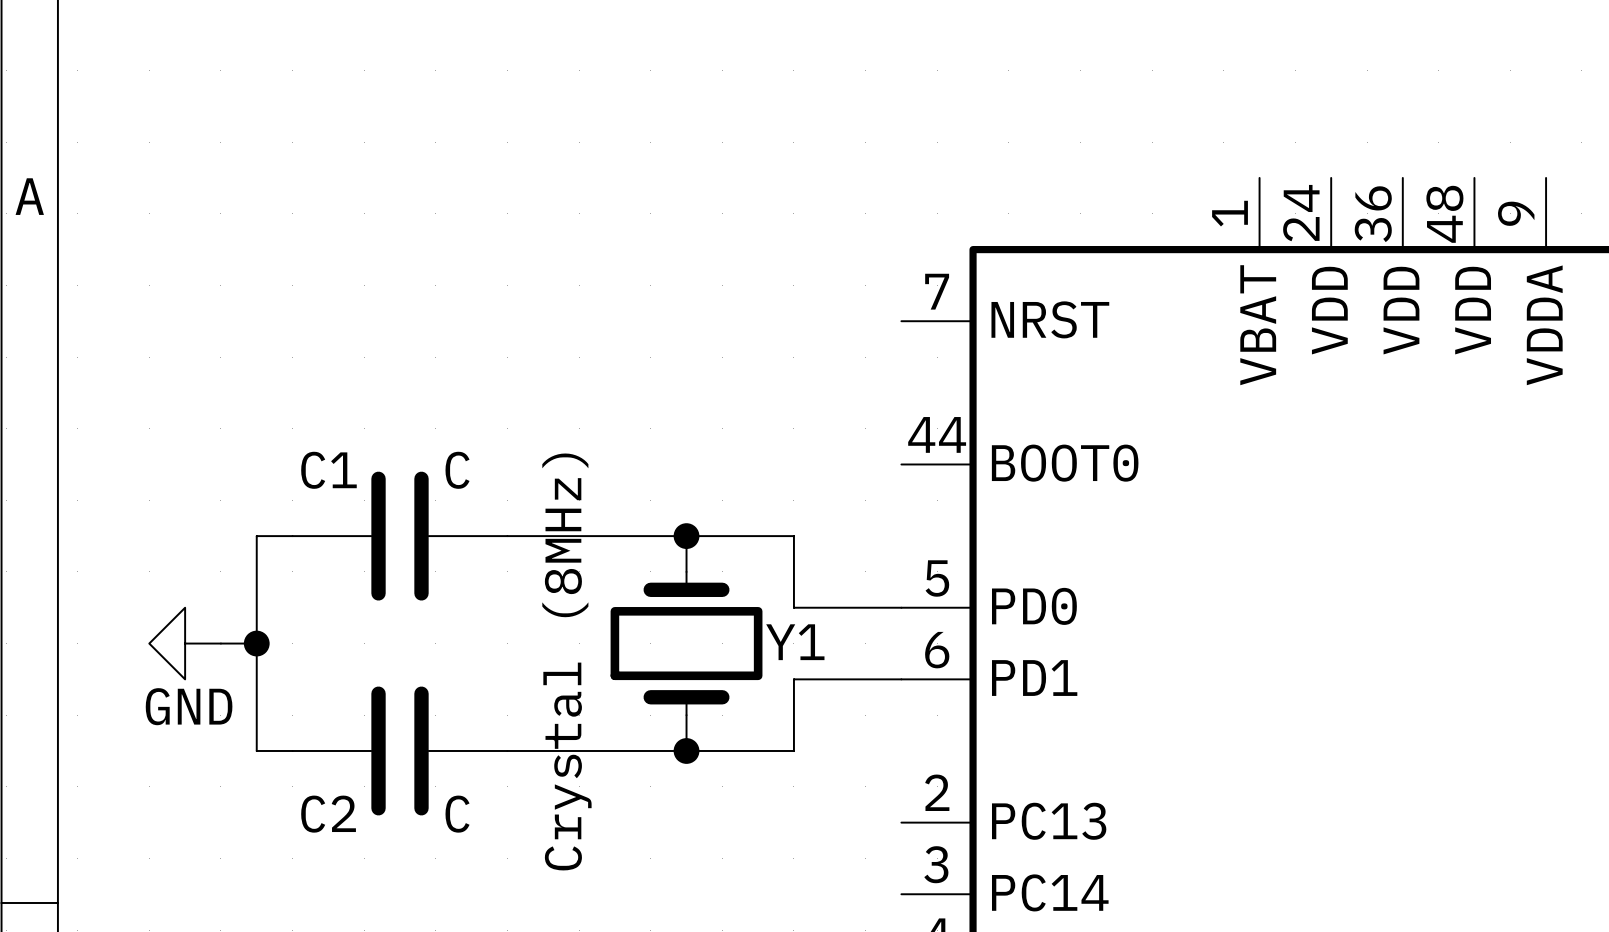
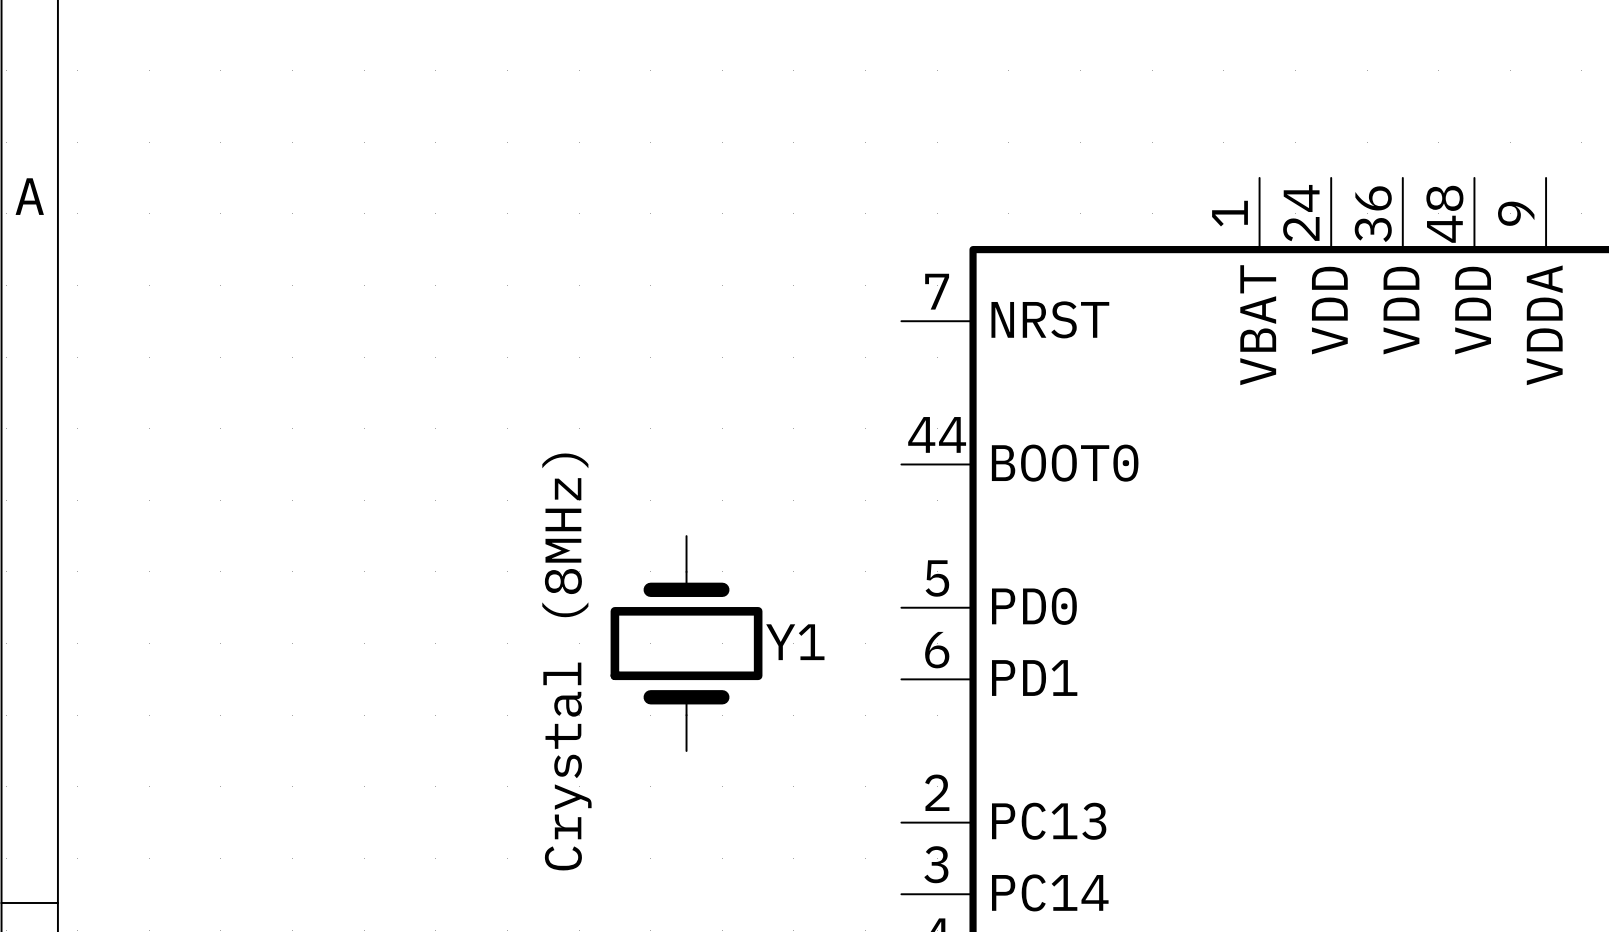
wire: (292, 536) (256, 536) (256, 750) (292, 750) -> none
C1: C (400, 536) -> none
wire: (507, 536) (793, 536) (793, 607) (901, 607) -> none
junction: (686, 536) -> none
power symbol: GND (185, 643) -> none
wire: (220, 643) (256, 643) -> none
junction: (256, 643) -> none
wire: (901, 679) (793, 679) (793, 750) (507, 750) -> none
C2: C (400, 750) -> none
junction: (686, 750) -> none

